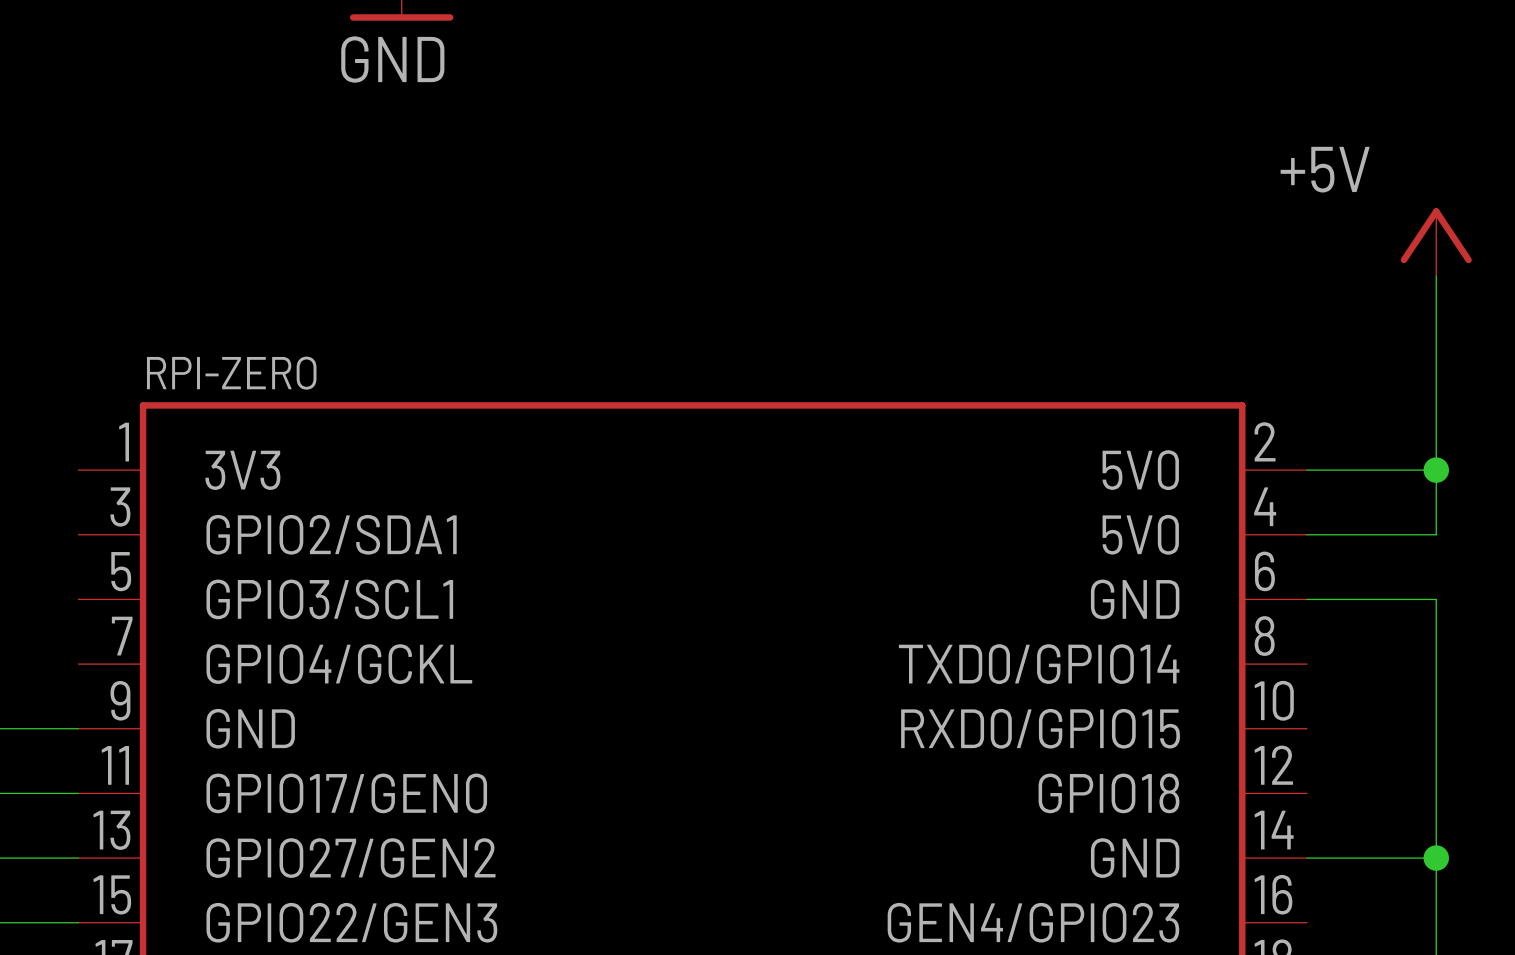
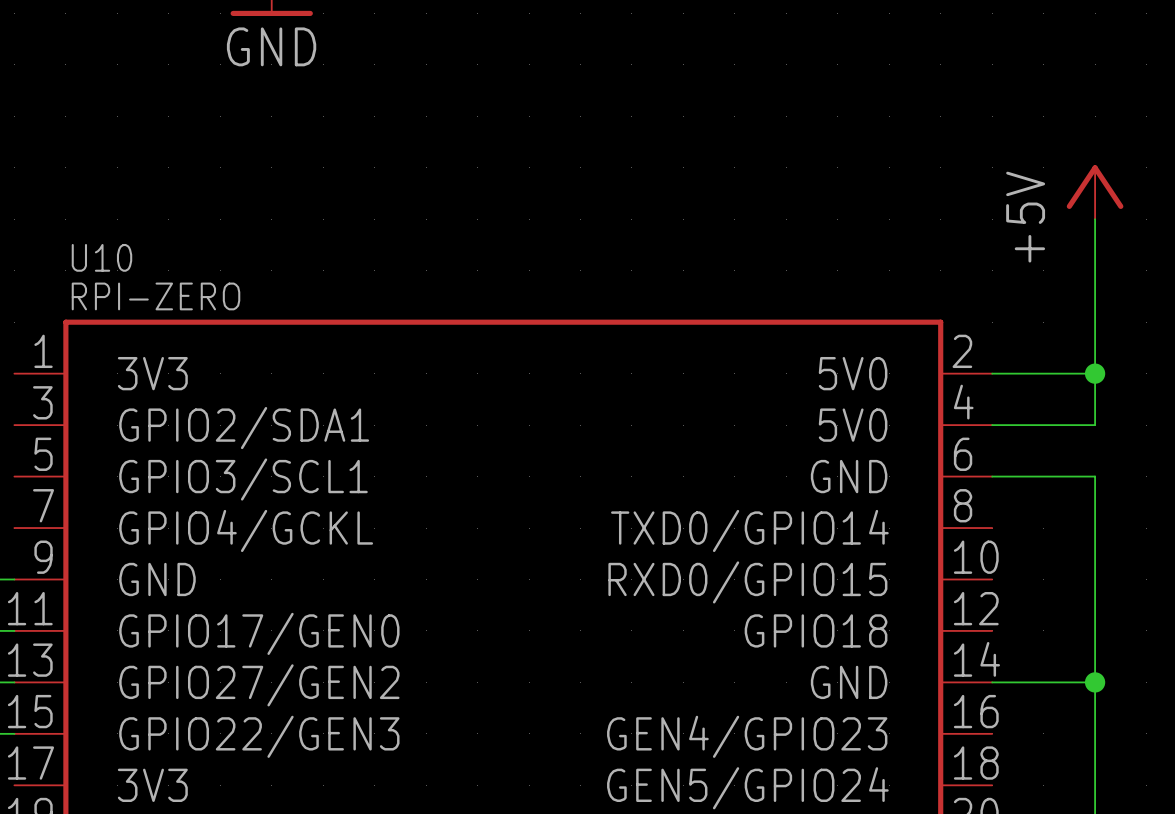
power symbol text rotation: 0° (1325, 169) -> 90° counterclockwise (1025, 217)
U10 name: none -> U10 (101, 257)

